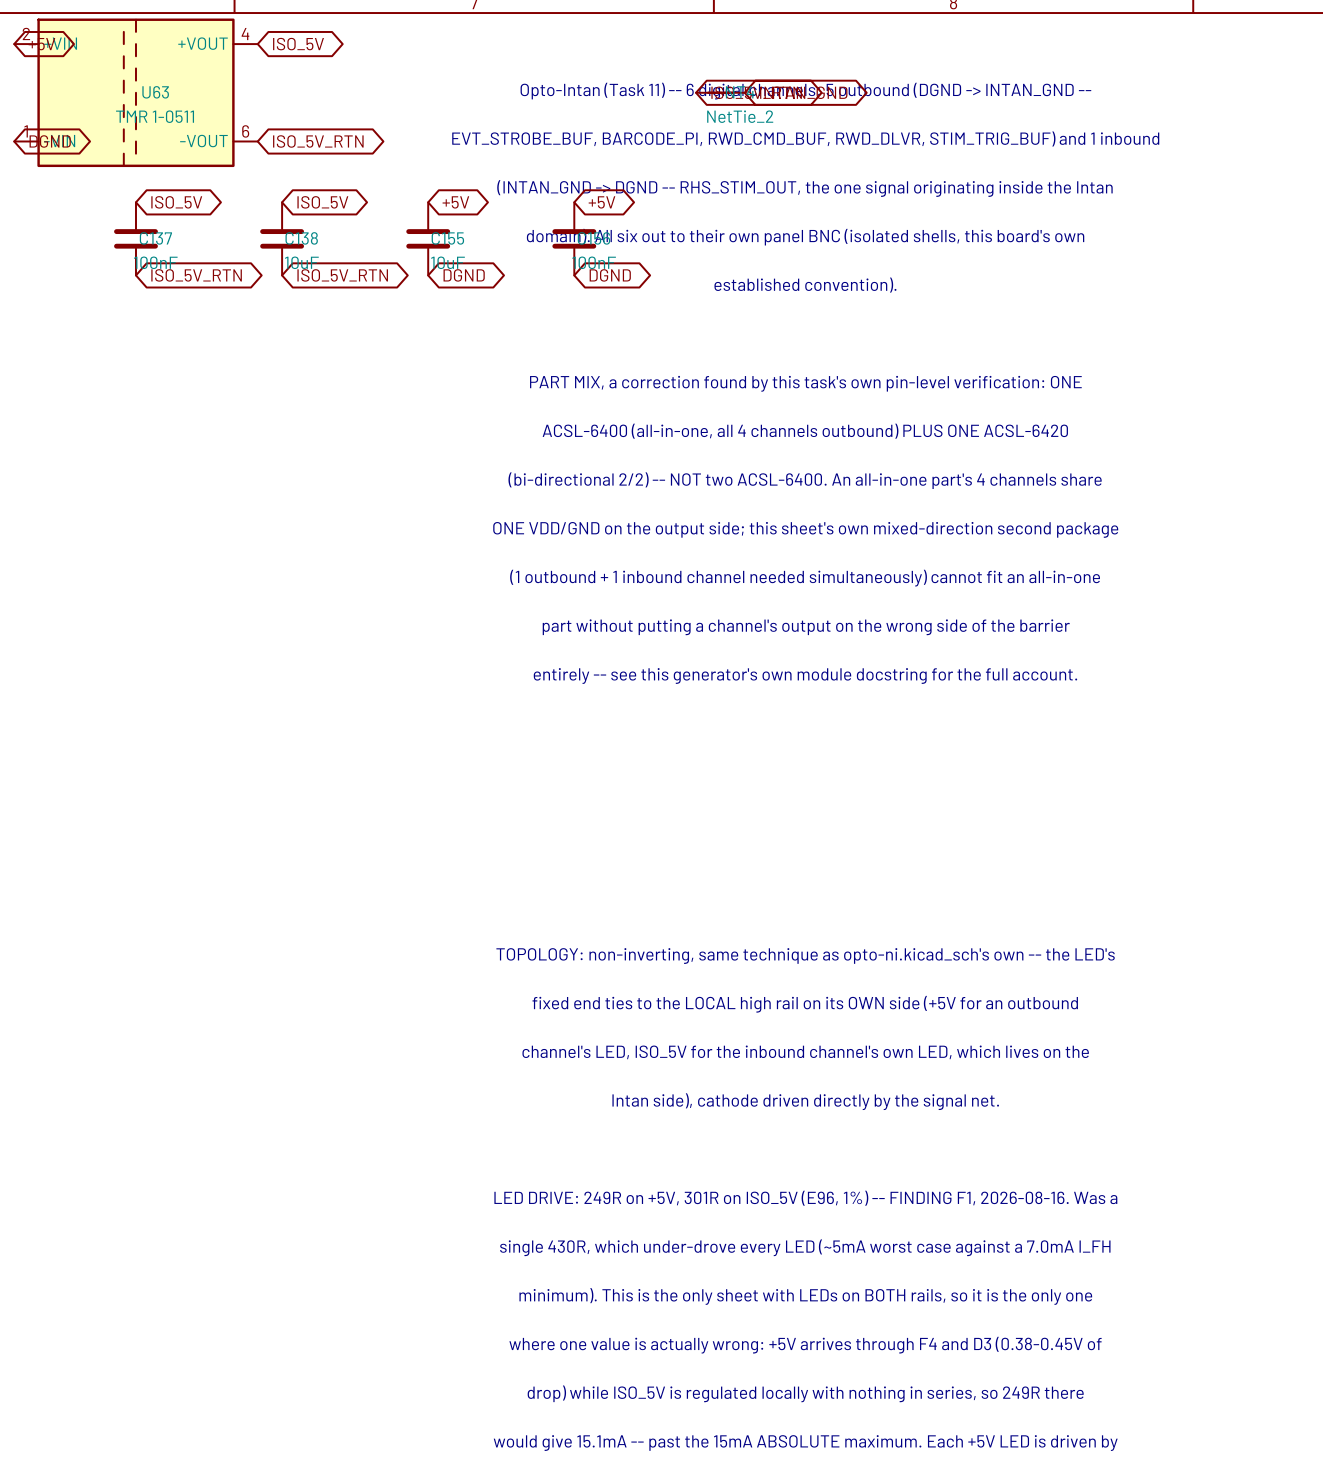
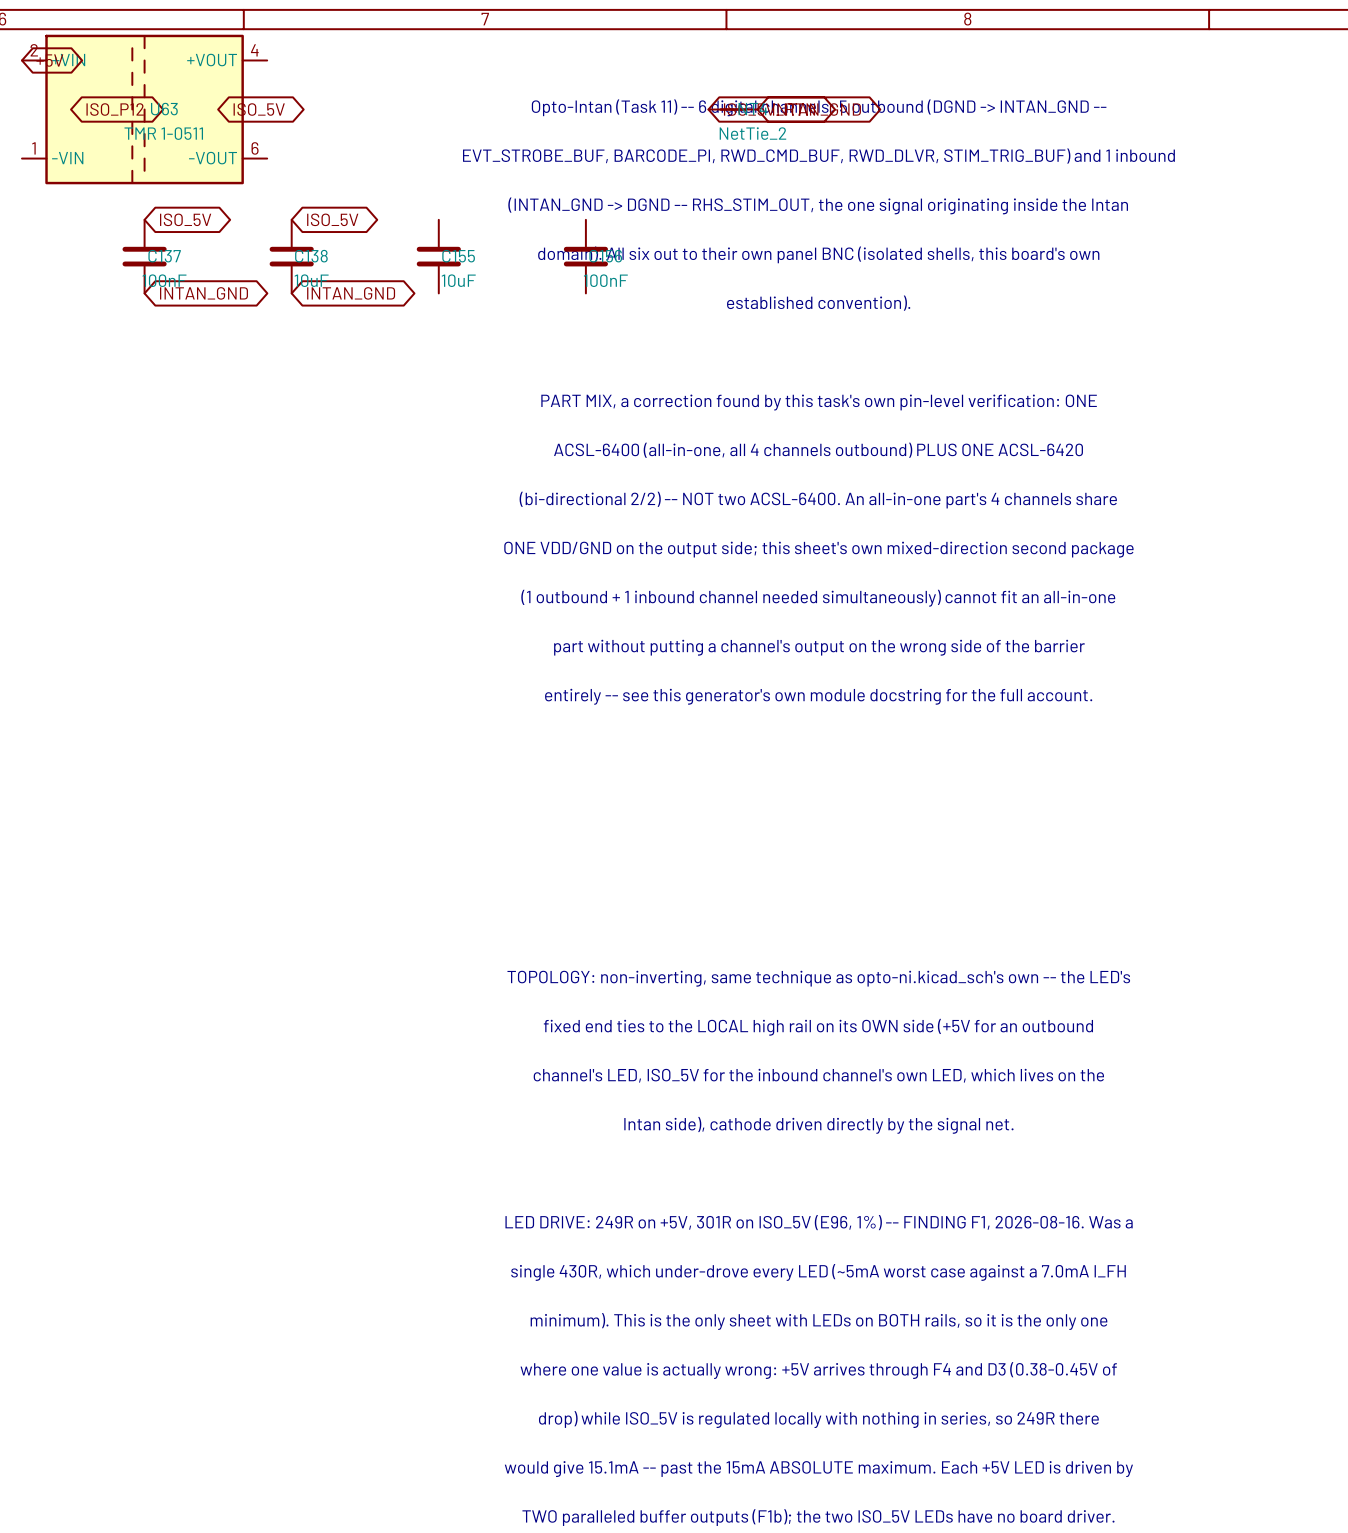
global label position: ISO_5V (298, 44) -> ISO_5V (259, 109)
global label: none -> ISO_P12 (115, 109)
global label: DGND (50, 141) -> none
global label: ISO_5V_RTN (318, 141) -> none
global label: +5V (455, 202) -> none
global label: +5V (601, 202) -> none
global label: ISO_5V_RTN (196, 275) -> INTAN_GND (203, 293)
global label: ISO_5V_RTN (342, 275) -> INTAN_GND (351, 293)
global label: DGND (464, 275) -> none
global label: DGND (610, 275) -> none

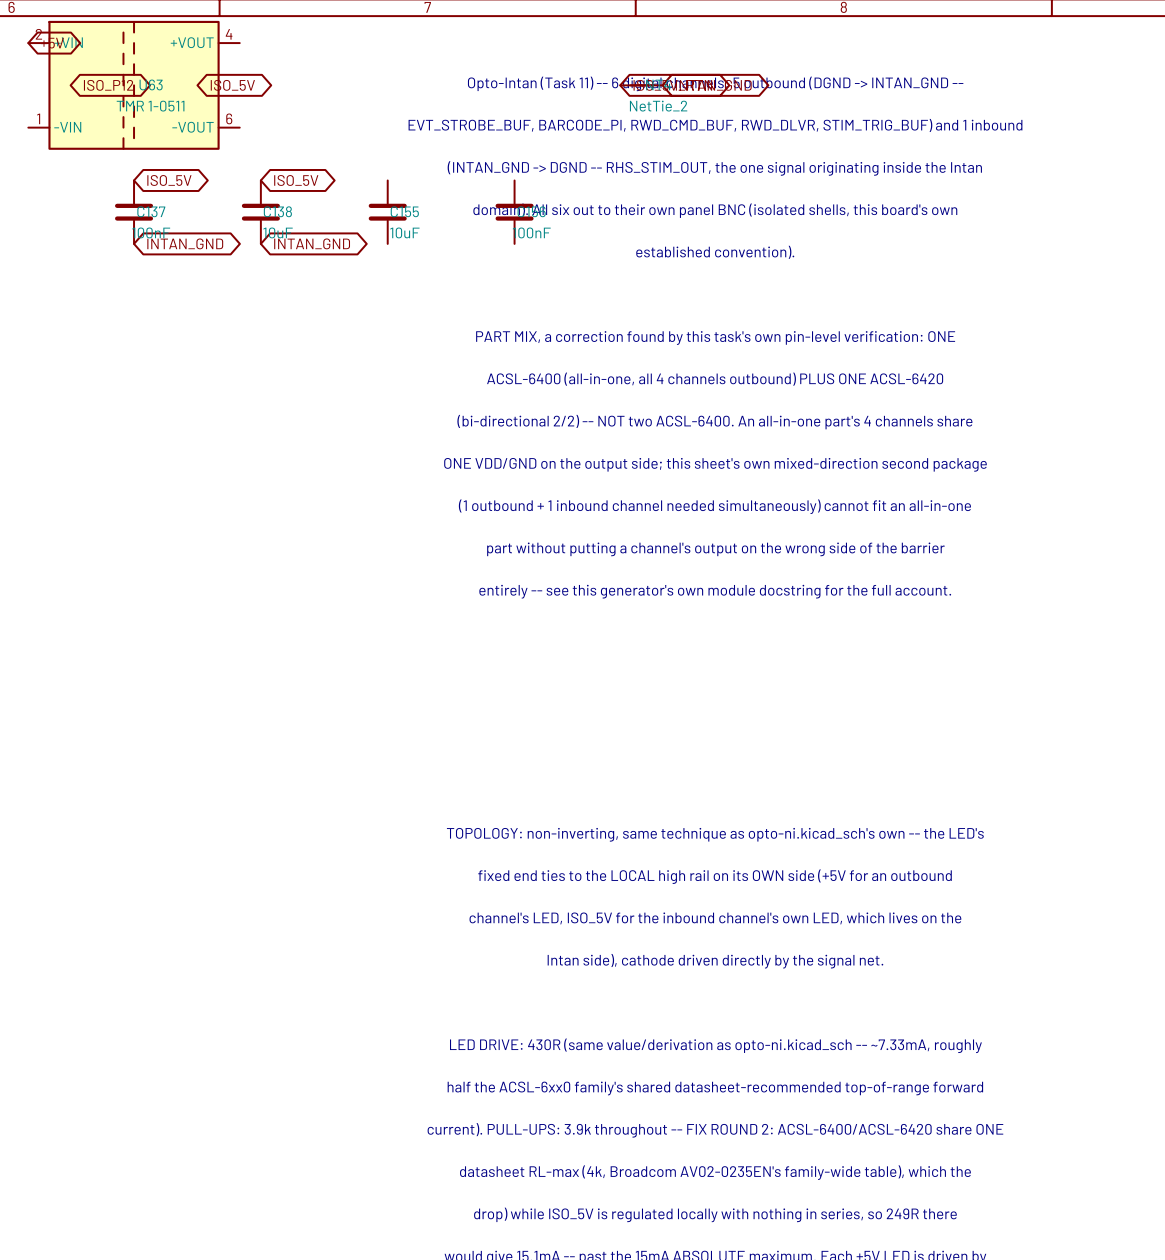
text: LED DRIVE: 249R on +5V, 301R on ISO_5V (E96, 1%) -- FINDING F1, 2026-08-16. Was a (819, 1222) -> LED DRIVE: 430R (same value/derivation as opto-ni.kicad_sch -- ~7.33mA, roughly (715, 1045)
text: single 430R, which under-drove every LED (~5mA worst case against a 7.0mA I_FH (818, 1272) -> half the ACSL-6xx0 family's shared datasheet-recommended top-of-range forward (715, 1088)
text: minimum). This is the only sheet with LEDs on BOTH rails, so it is the only one (819, 1321) -> current). PULL-UPS: 3.9k throughout -- FIX ROUND 2: ACSL-6400/ACSL-6420 share ONE (715, 1130)
text: where one value is actually wrong: +5V arrives through F4 and D3 (0.38-0.45V of (818, 1370) -> datasheet RL-max (4k, Broadcom AV02-0235EN's family-wide table), which the (715, 1172)

